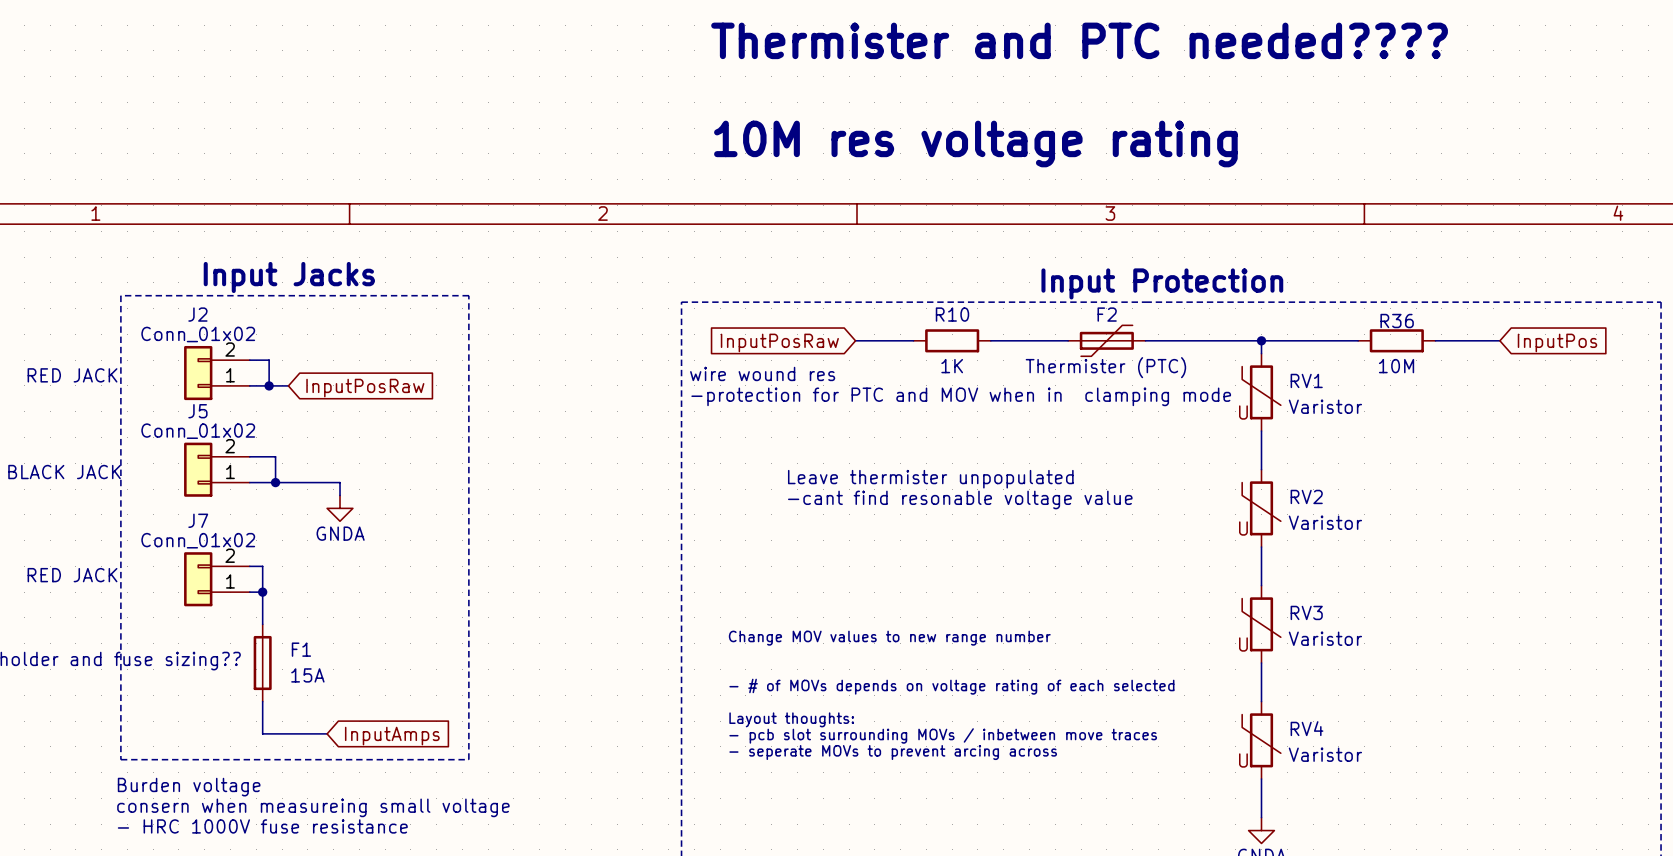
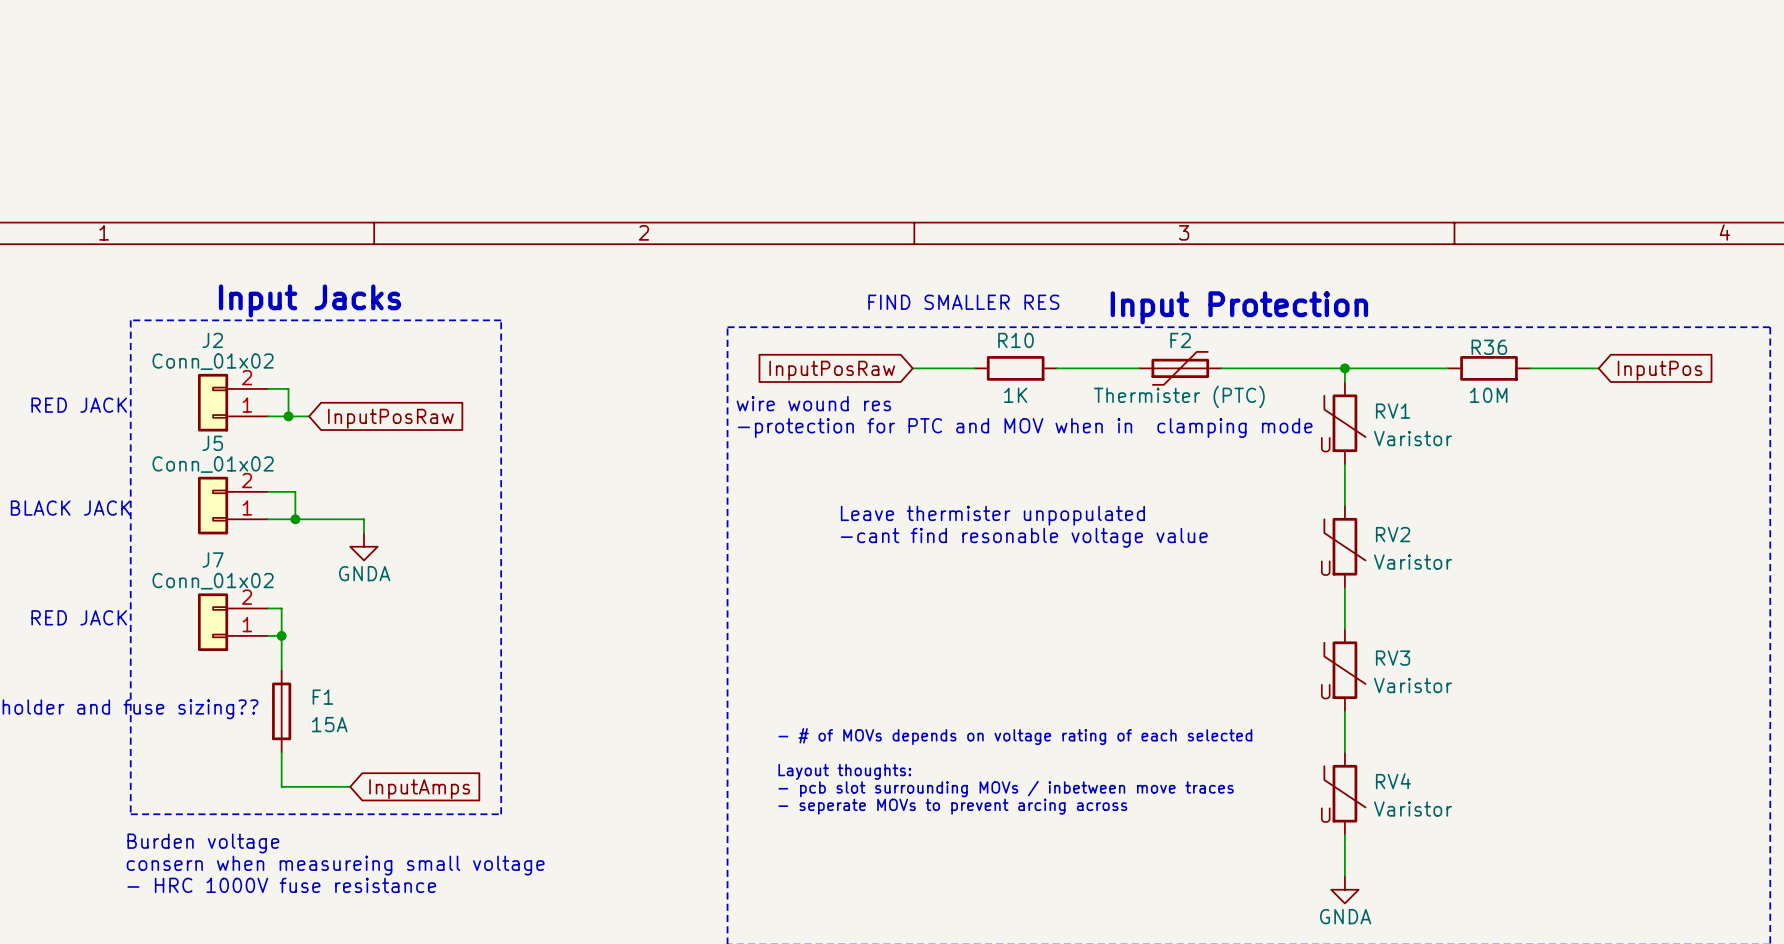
text: Thermister and PTC needed???? (1079, 40) -> none
text: 10M res voltage rating (975, 143) -> none
text: none -> FIND SMALLER RES (963, 302)
text: Change MOV values to new range number (889, 638) -> none

